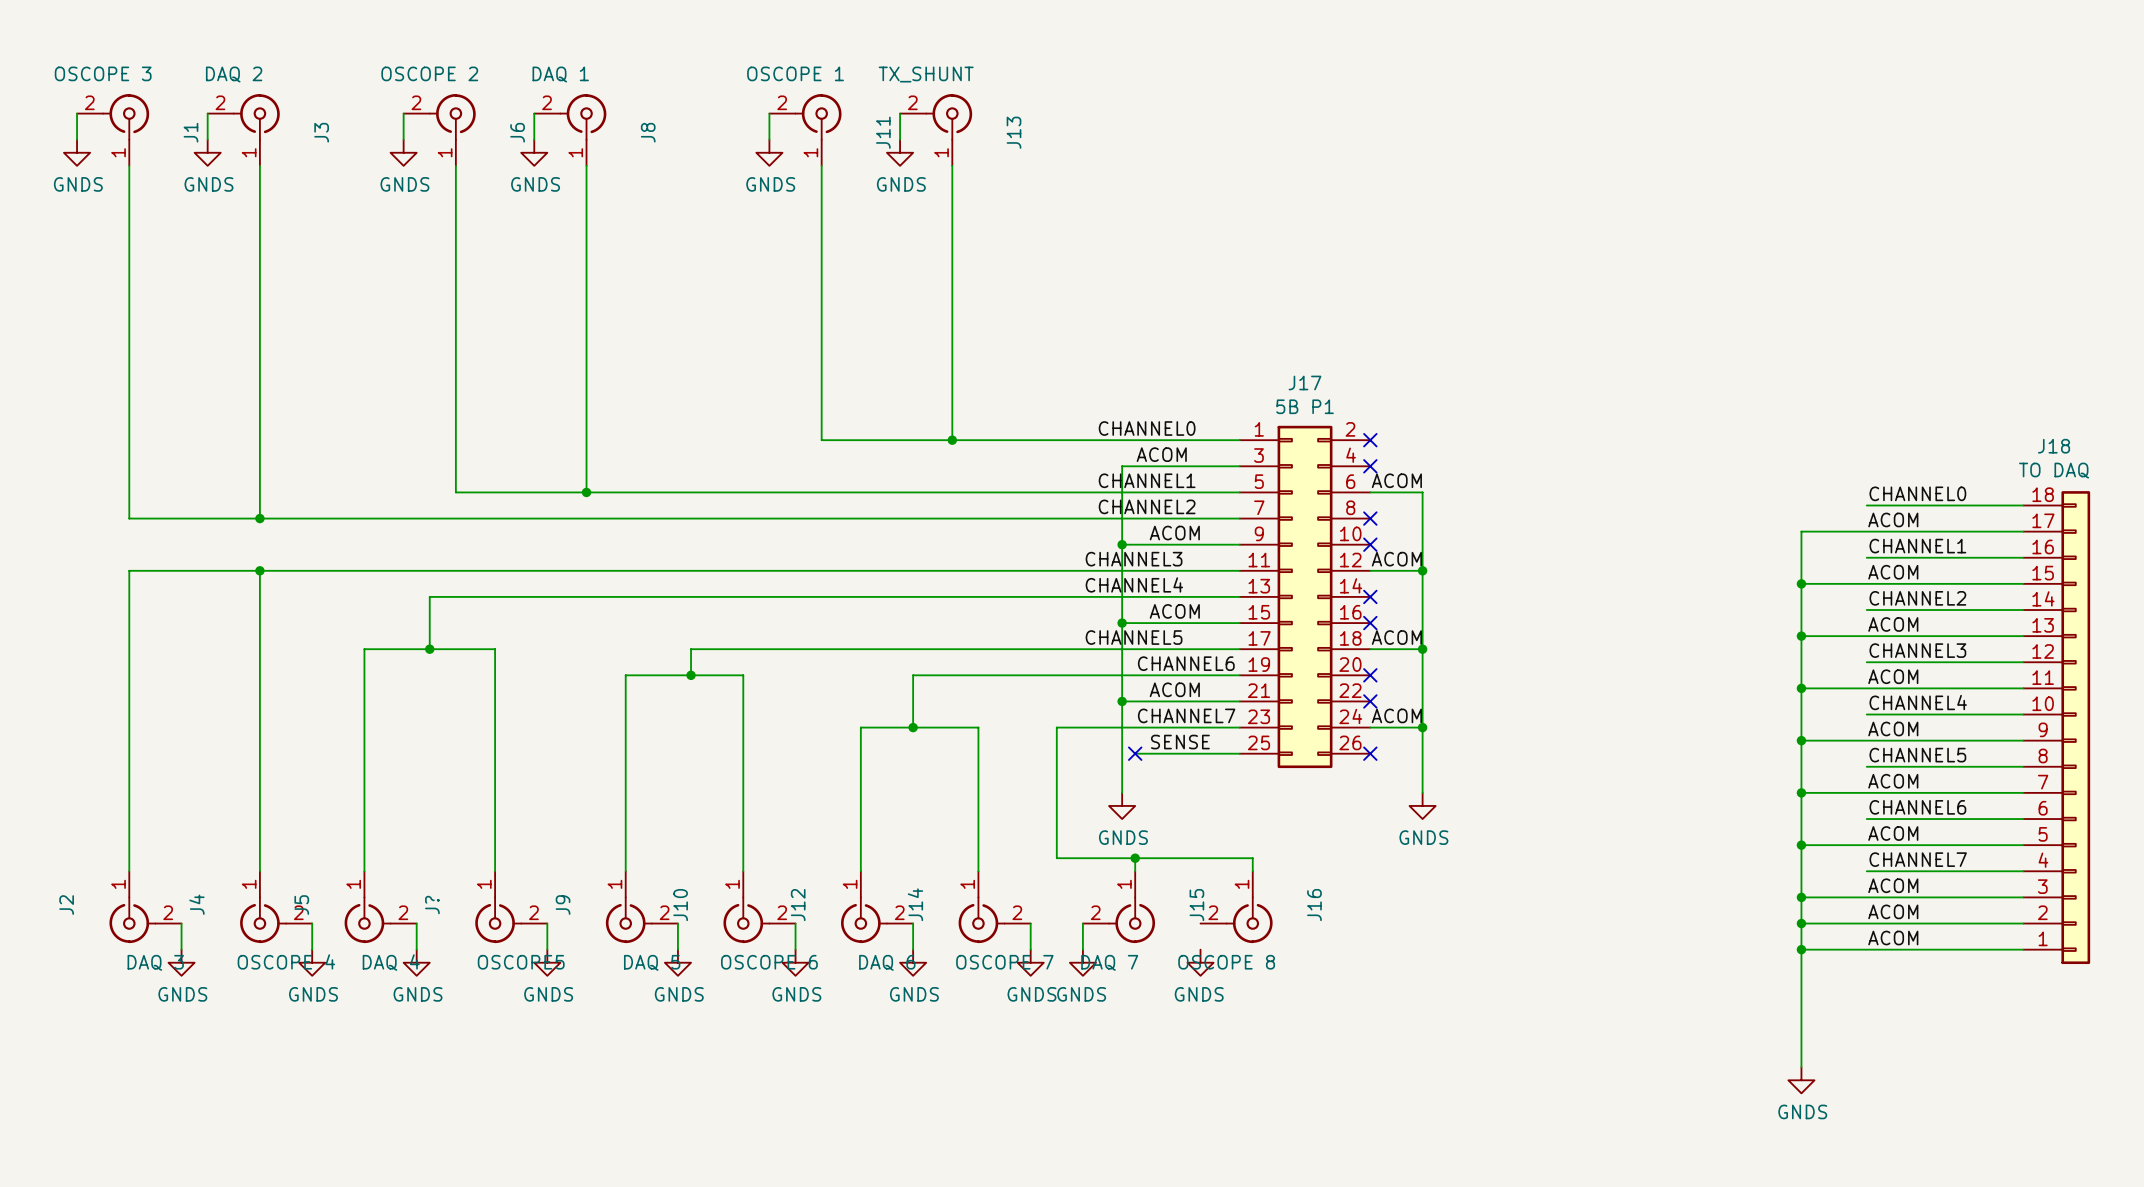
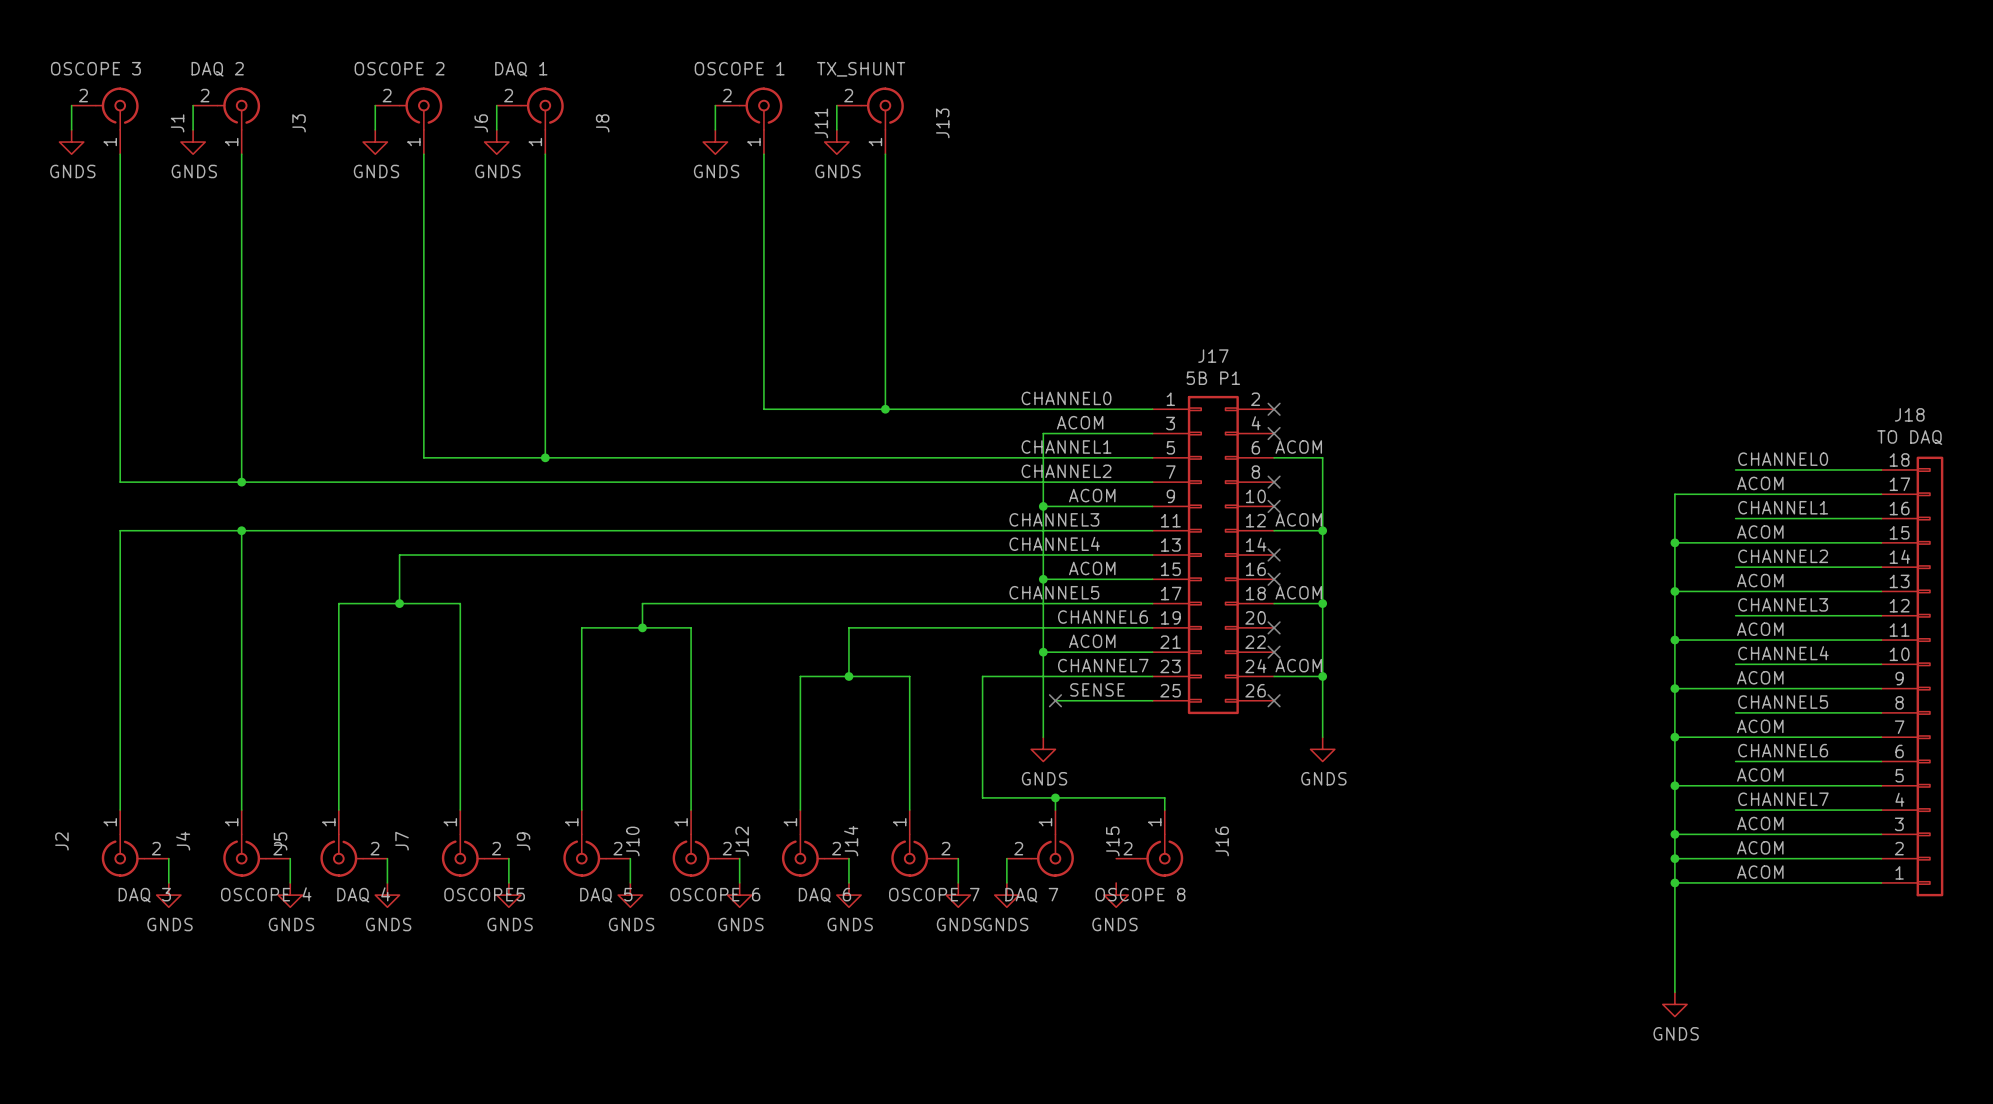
J? name: J? (432, 905) -> J7 (402, 841)

